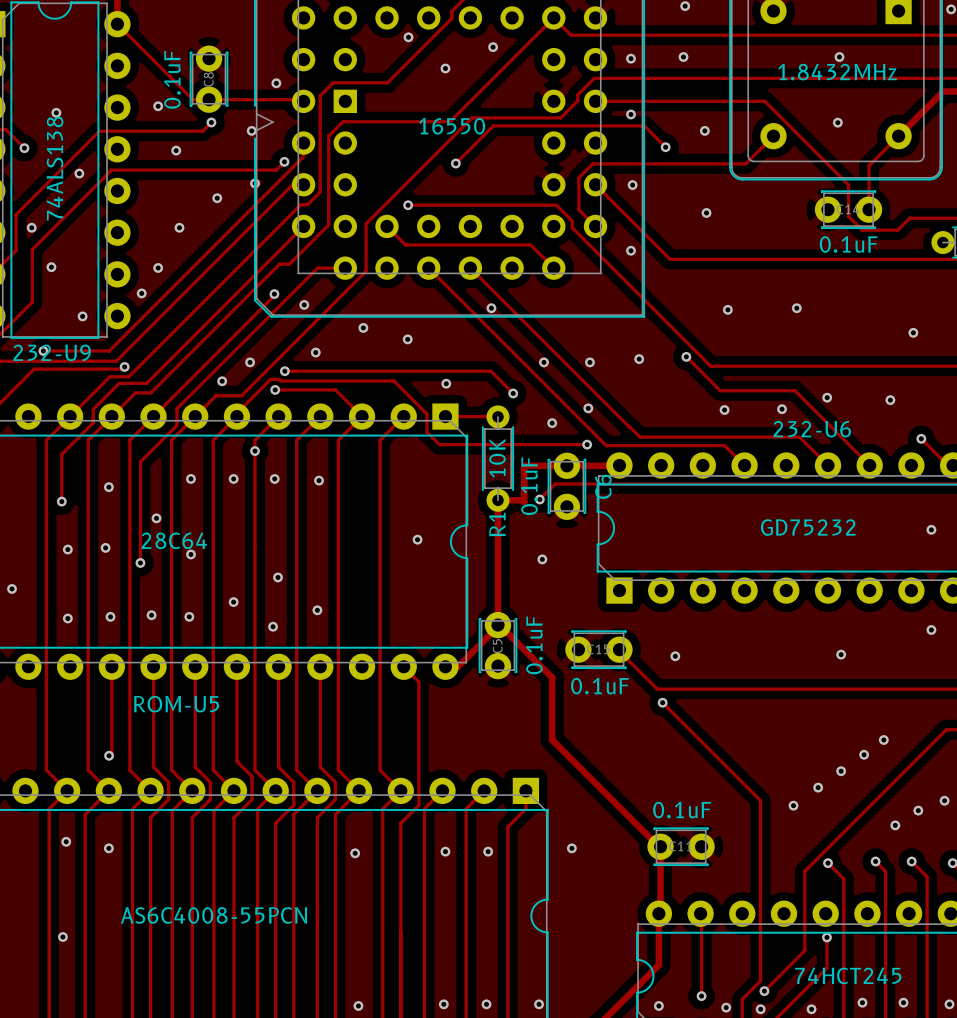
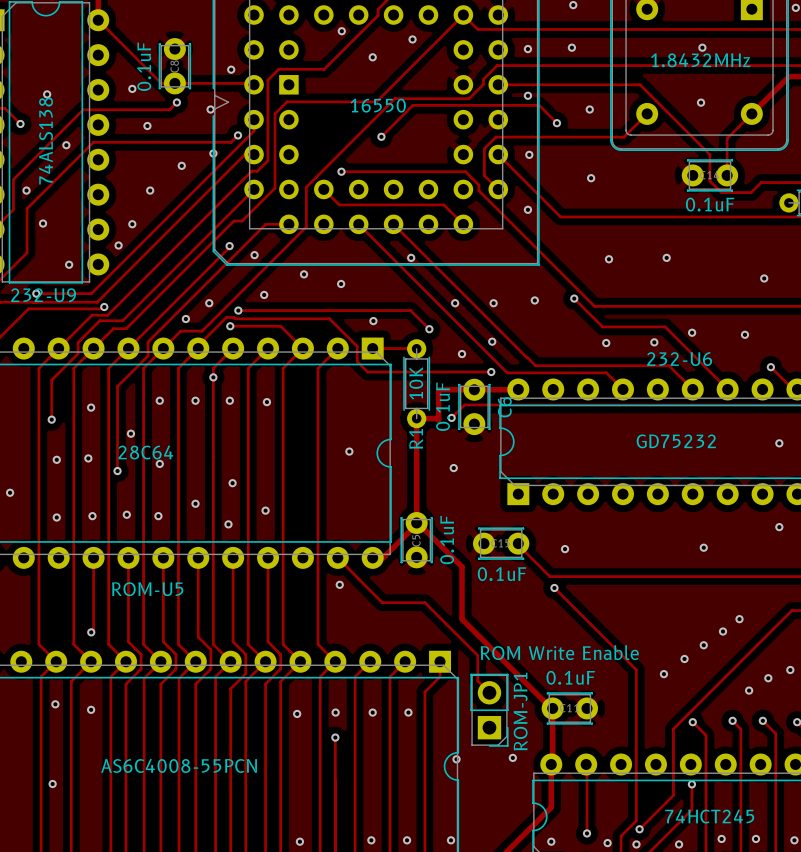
track: (418, 681) (418, 805) (400, 823) (400, 881) -> (350, 570) (382, 602) (424, 602) (477, 655) (477, 681) (489, 692)
via: none -> (339, 584)
via: (571, 848) -> none
ROM-JP1: none -> ROM Write Enable (489, 710)
via: none -> (335, 712)
via: none -> (335, 737)
via: none -> (512, 757)
via: none -> (456, 759)

